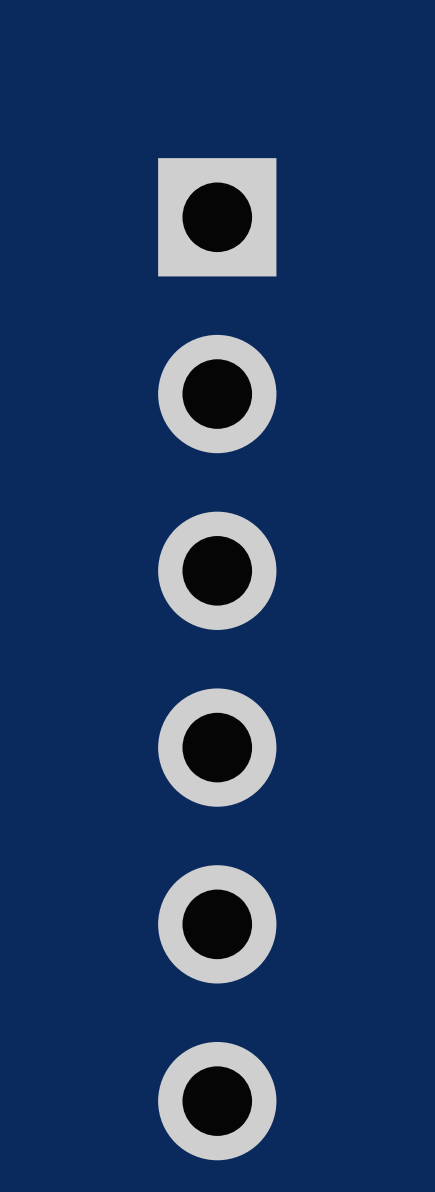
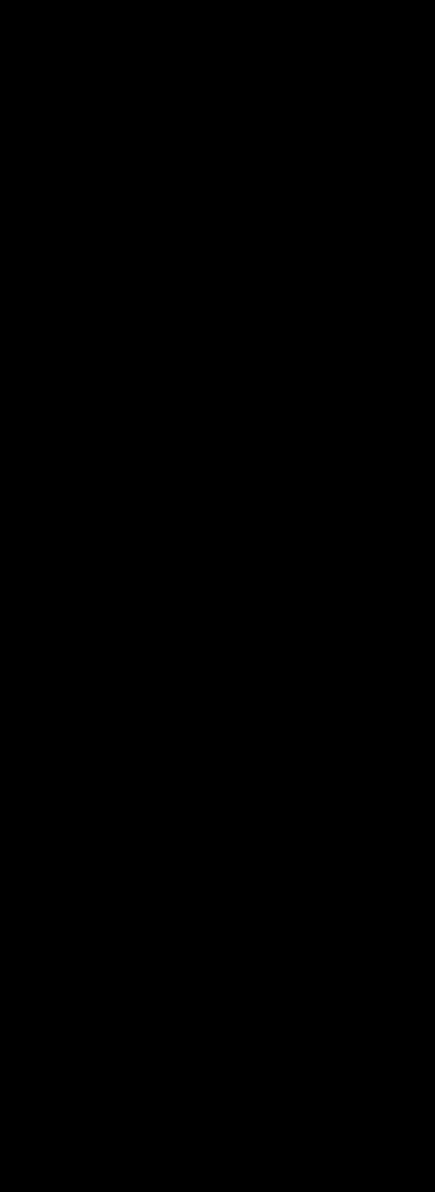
part: (217, 659) -> none

